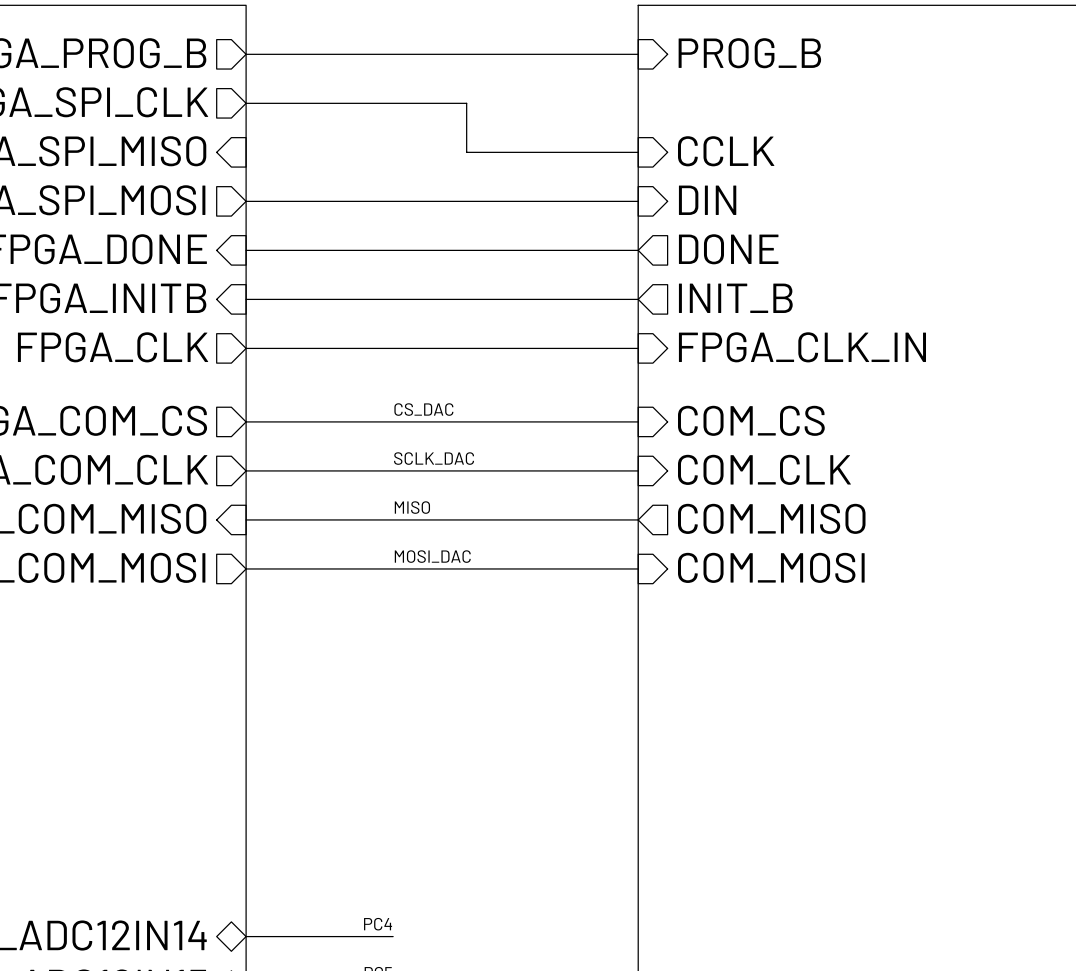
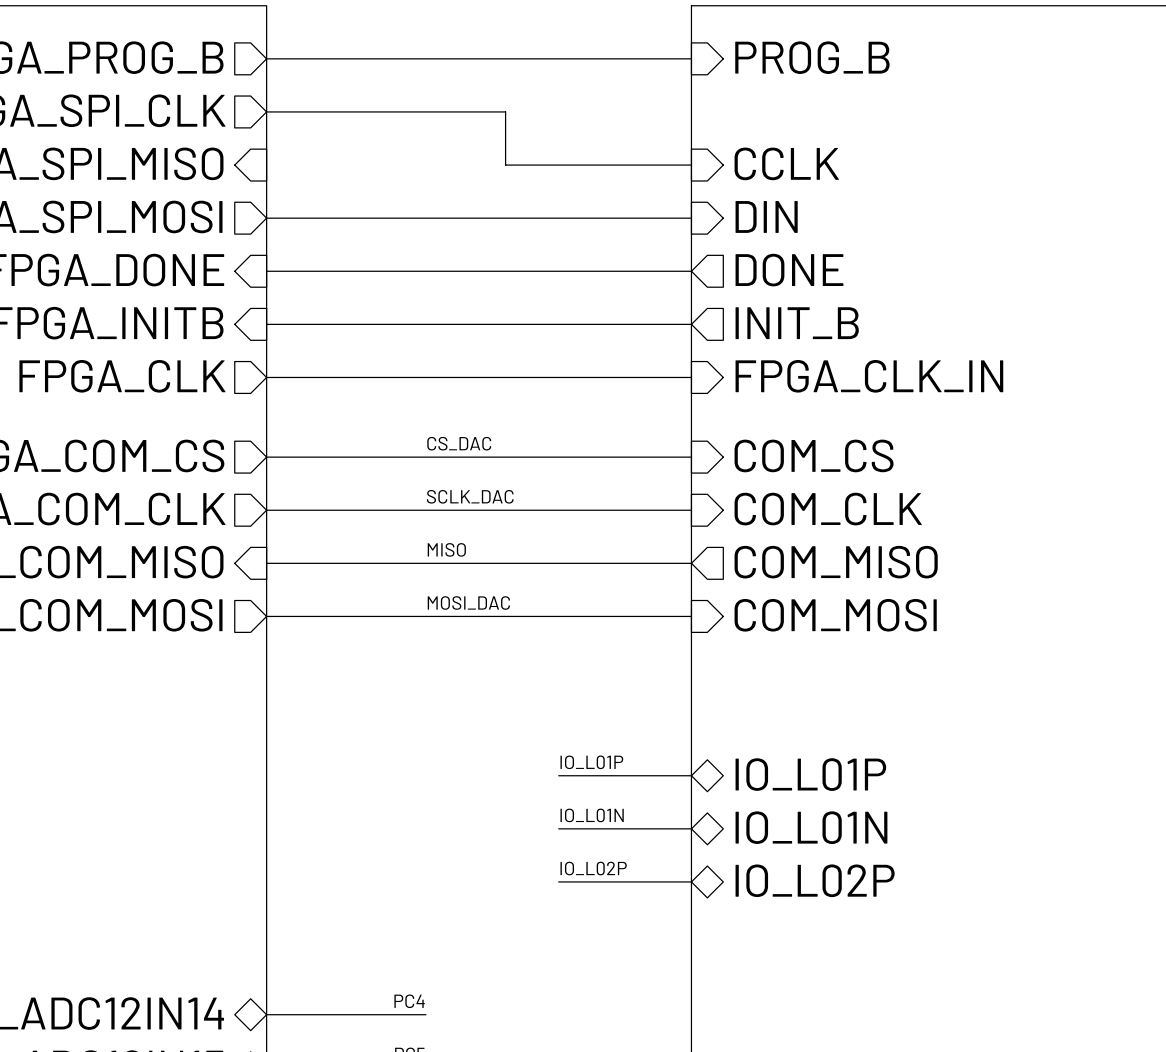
label: none -> IO_L01P (591, 762)
sheet pin: none -> IO_L01P (810, 774)
wire: none -> (558, 775) (691, 775)
label: none -> IO_L01N (592, 815)
sheet pin: none -> IO_L01N (811, 827)
wire: none -> (558, 828) (691, 828)
label: none -> IO_L02P (593, 868)
sheet pin: none -> IO_L02P (815, 880)
wire: none -> (558, 881) (691, 881)

